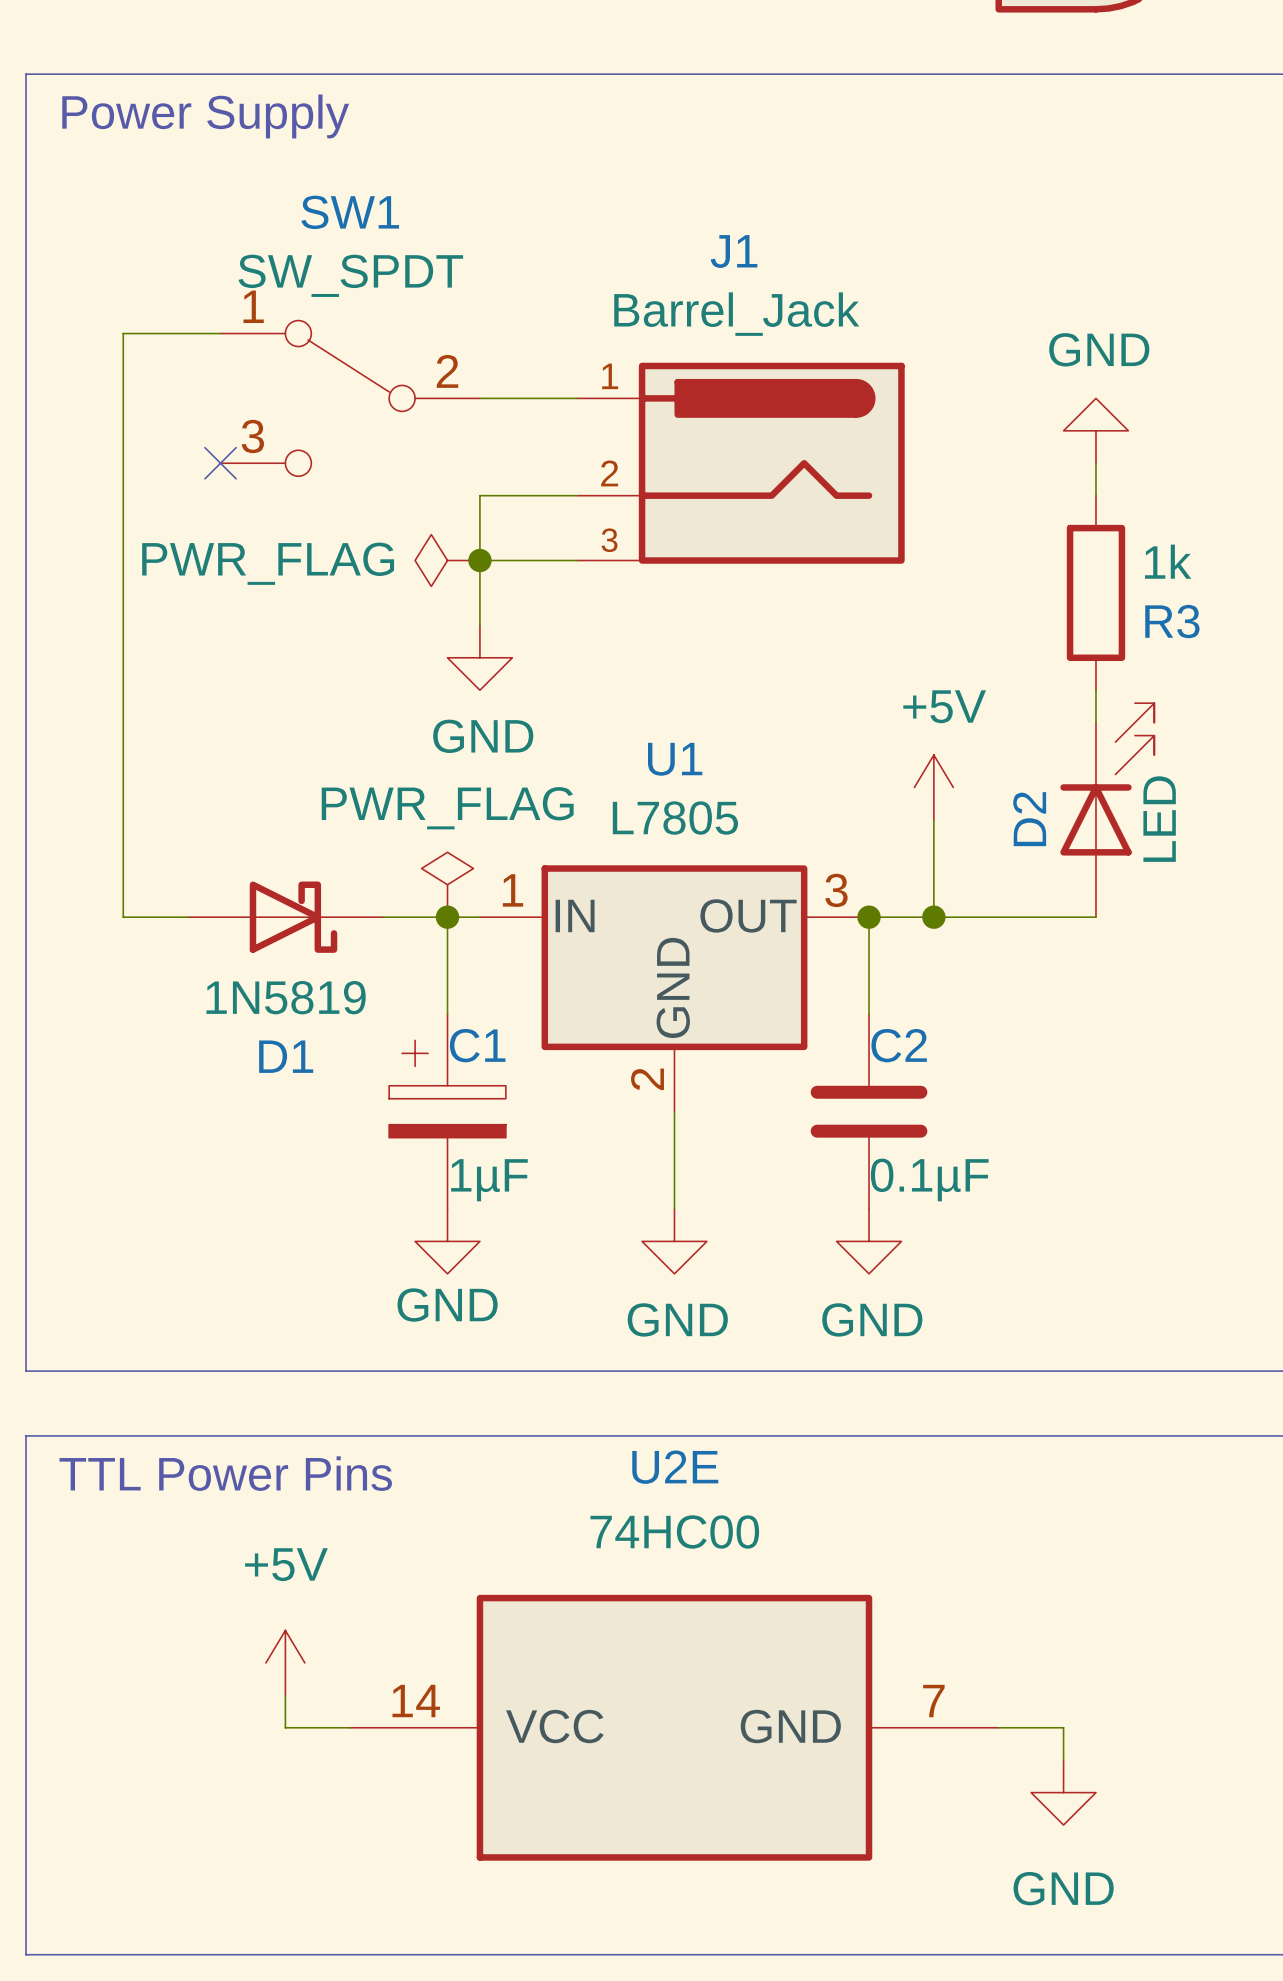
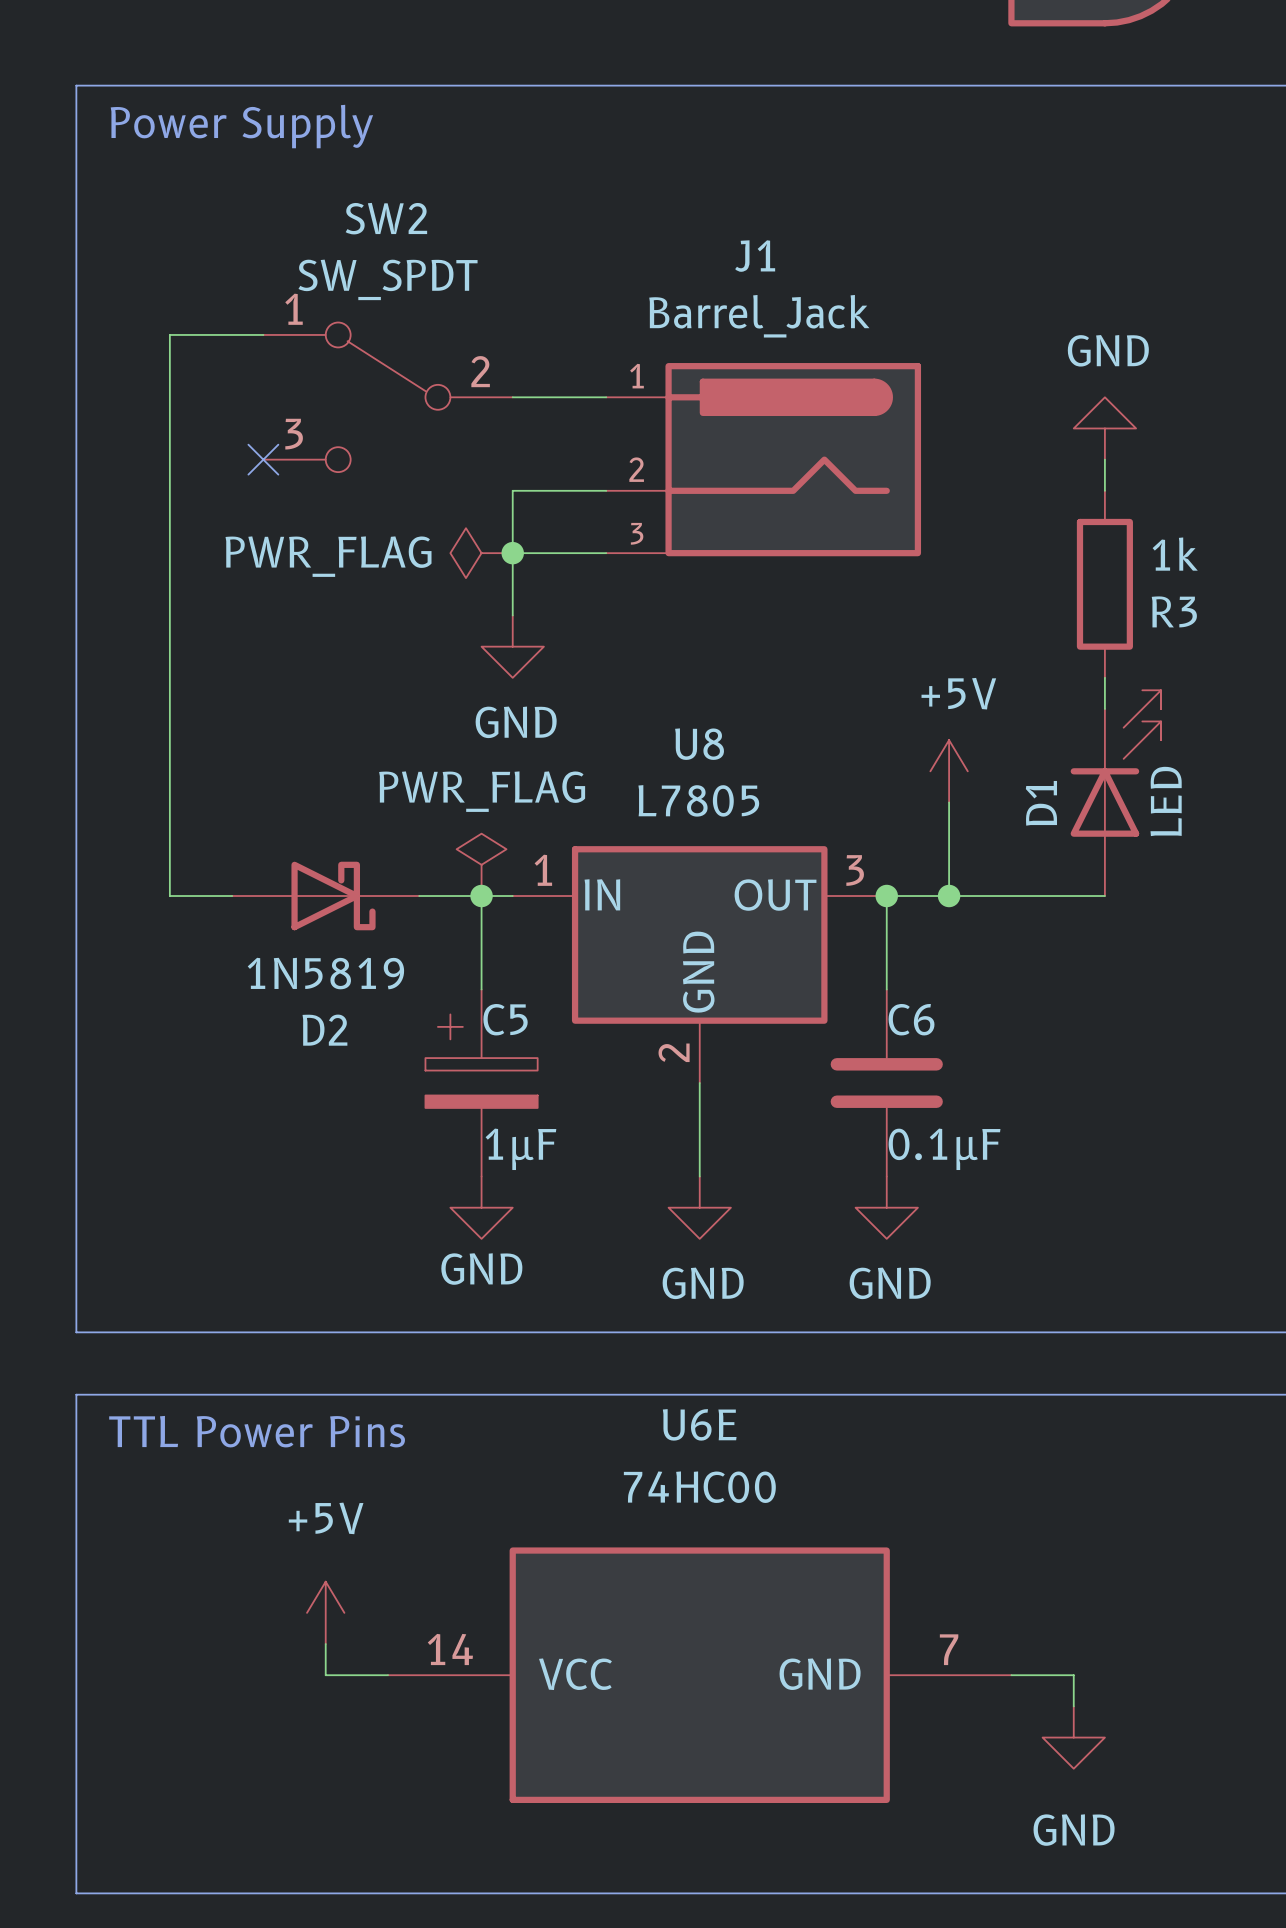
SW1 name: SW1 (350, 212) -> SW2 (386, 218)
U1 name: U1 (675, 759) -> U8 (699, 744)
D2 name: D2 (1029, 819) -> D1 (1041, 803)
C1 name: C1 (477, 1045) -> C5 (505, 1019)
C2 name: C2 (899, 1045) -> C6 (911, 1019)
D1 name: D1 (286, 1056) -> D2 (324, 1030)
U2E name: U2E (675, 1467) -> U6E (699, 1424)

